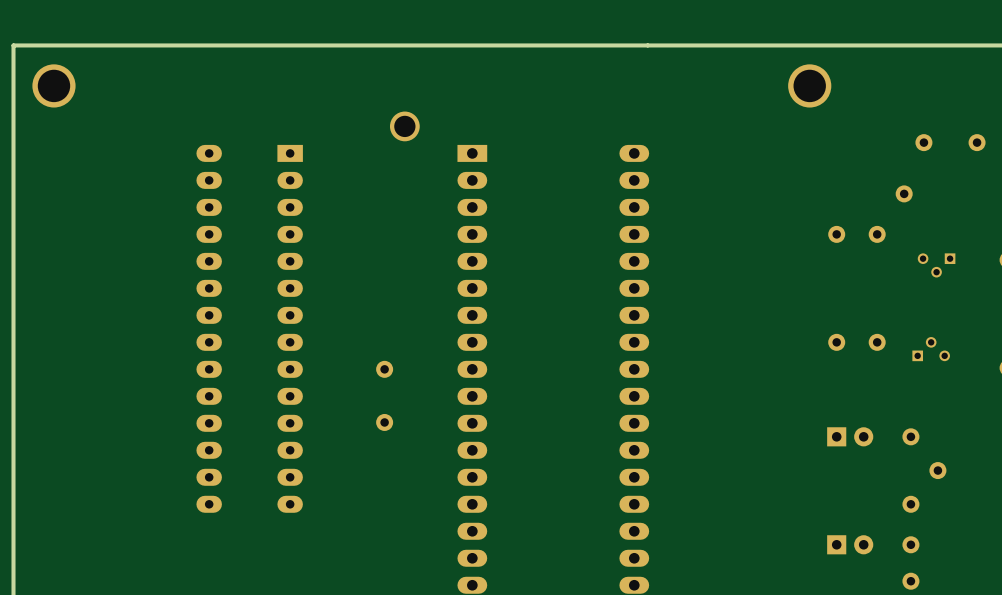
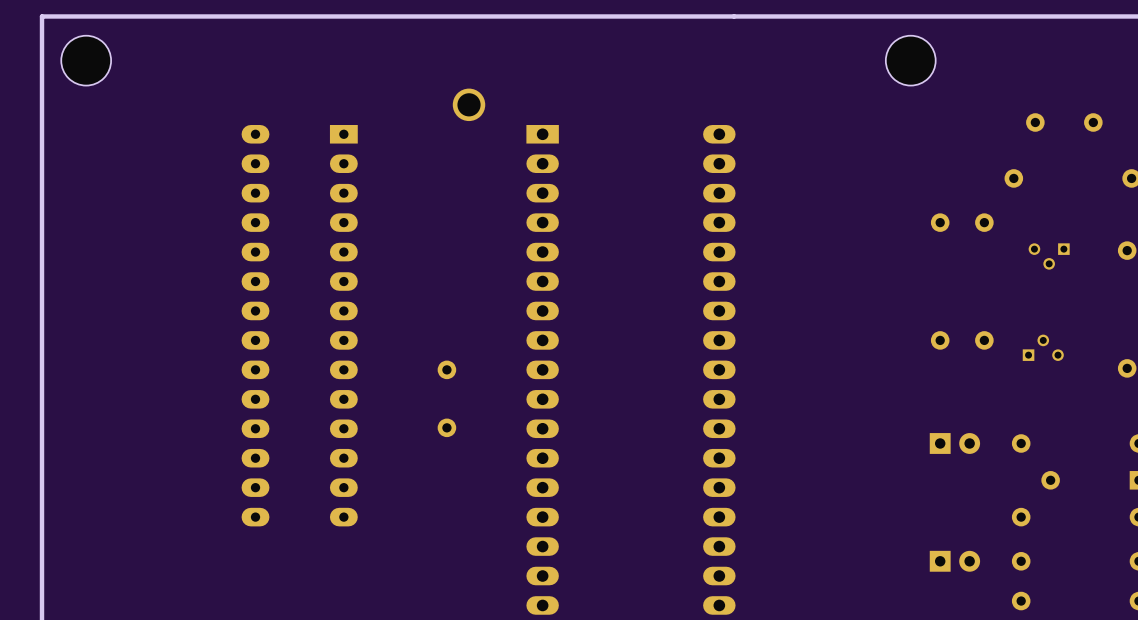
part footprint: [32, 64, 76, 108] -> [61, 35, 112, 86]
part footprint: [788, 64, 832, 108] -> [885, 35, 936, 86]

